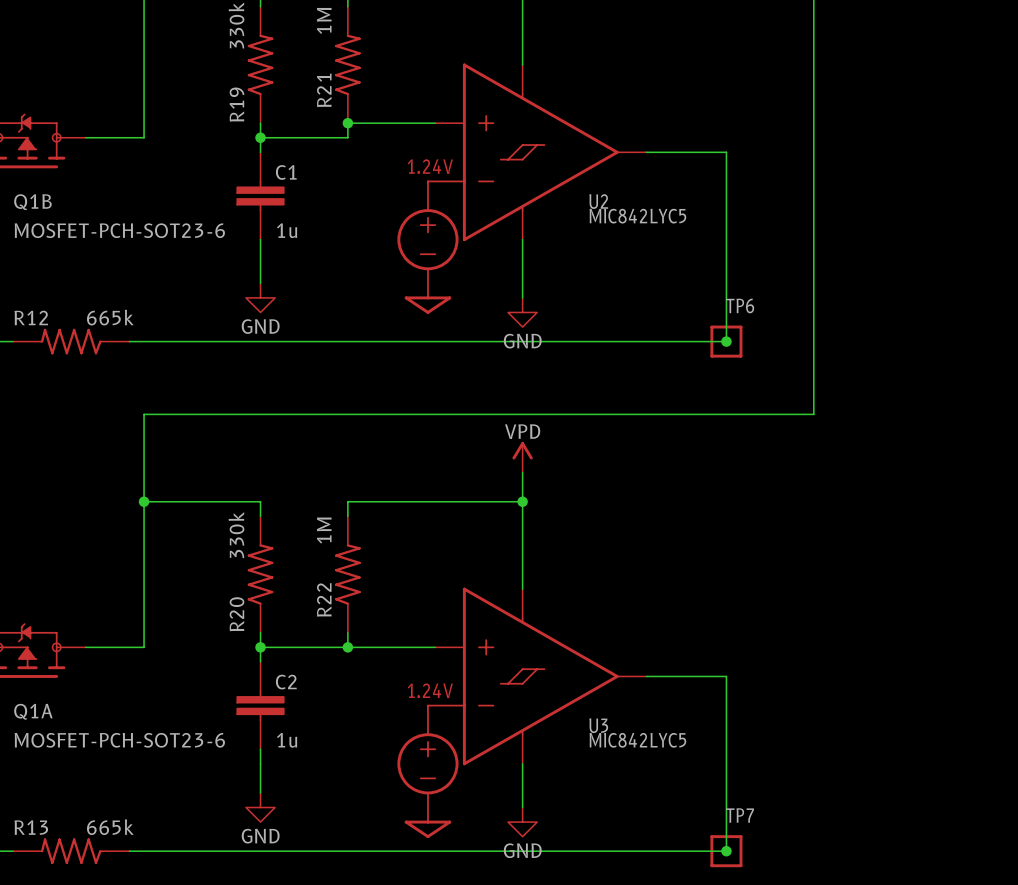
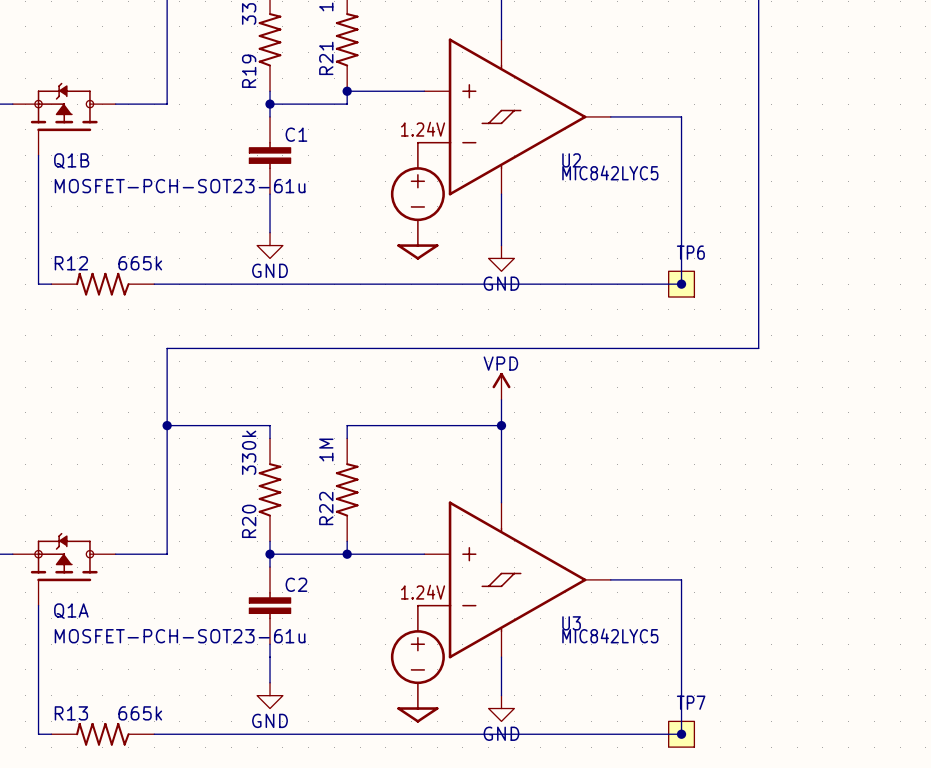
TP6 symbol: [710, 325, 743, 358] -> [668, 271, 695, 298]
TP7 symbol: [710, 835, 743, 868] -> [668, 721, 695, 748]

